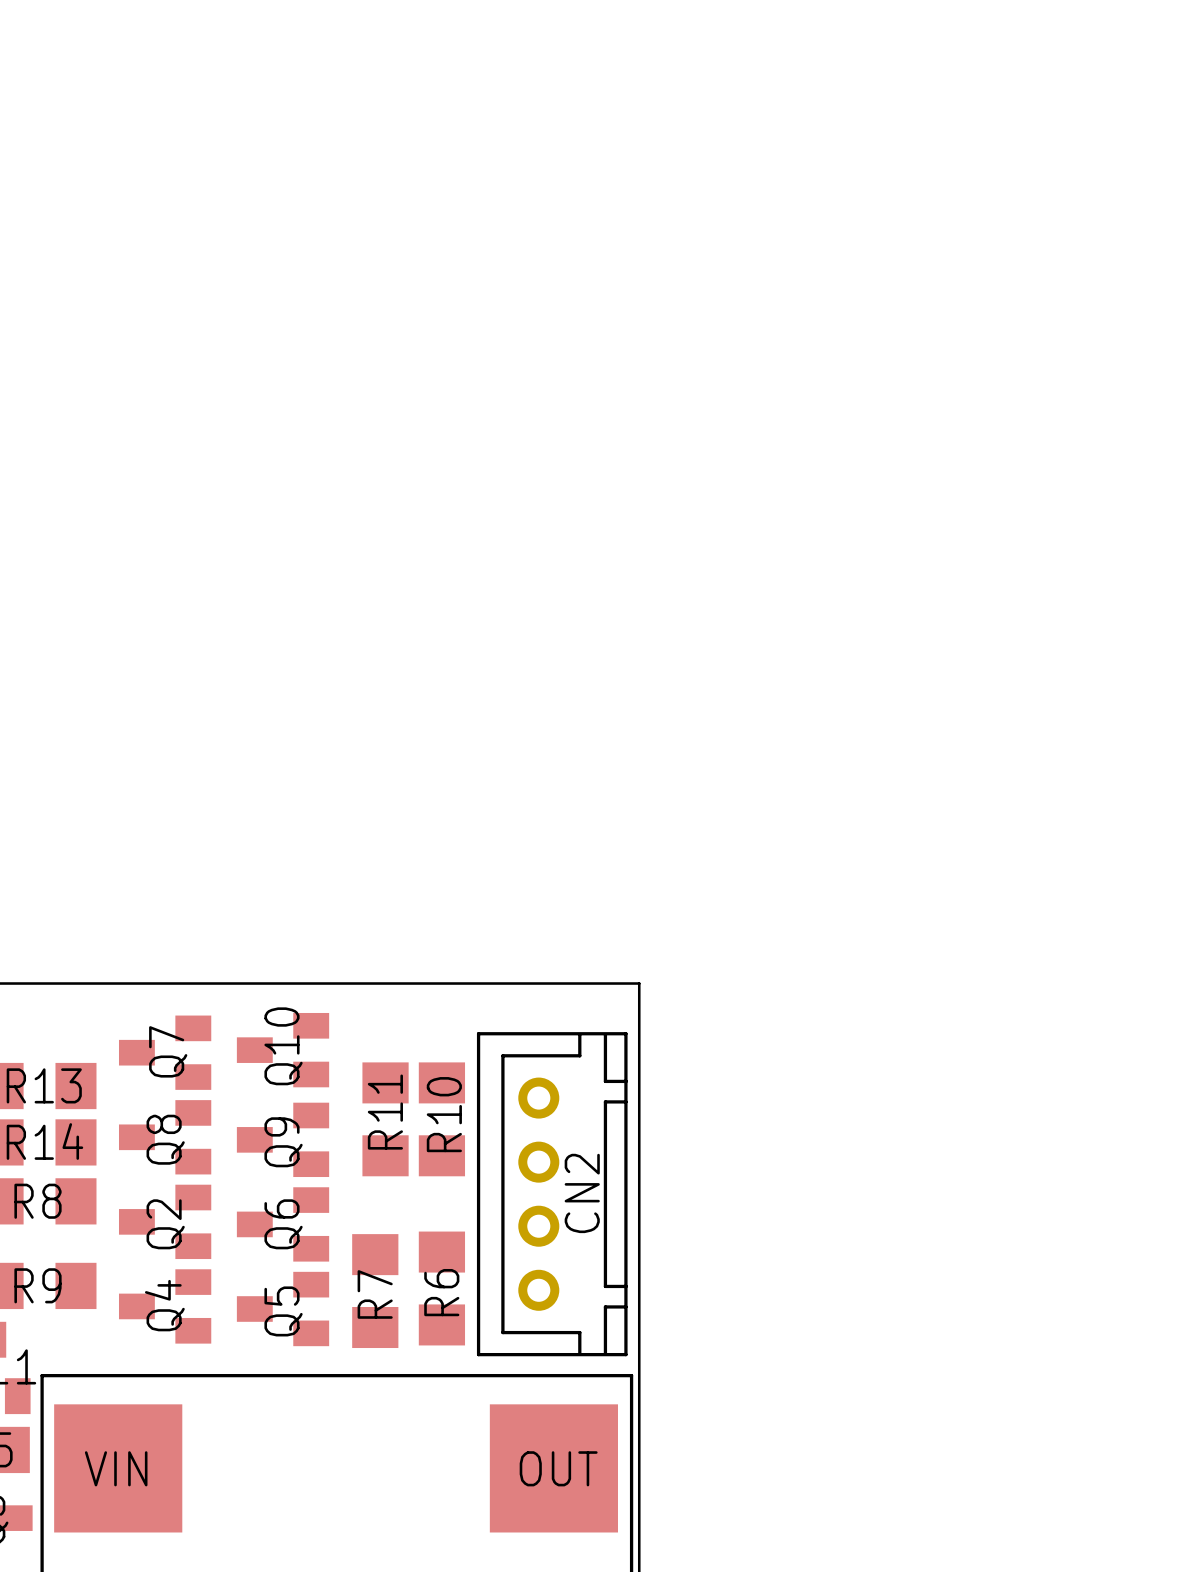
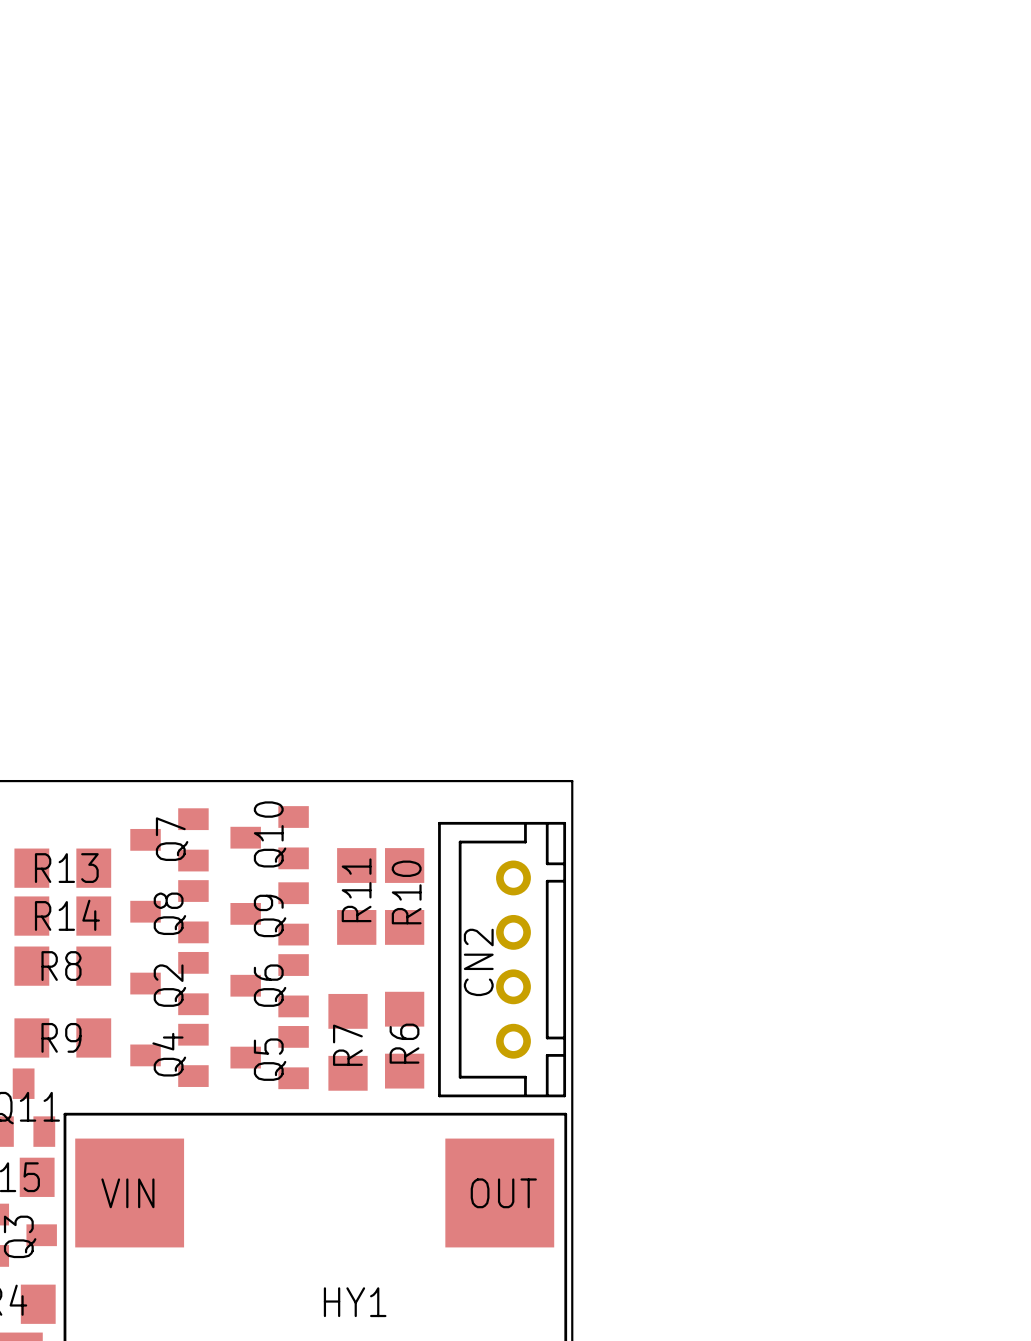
CN2 footprint: [476, 1032, 628, 1357] -> [438, 821, 567, 1098]
CN2 name position: CN2 (582, 1193) -> CN2 (478, 962)

